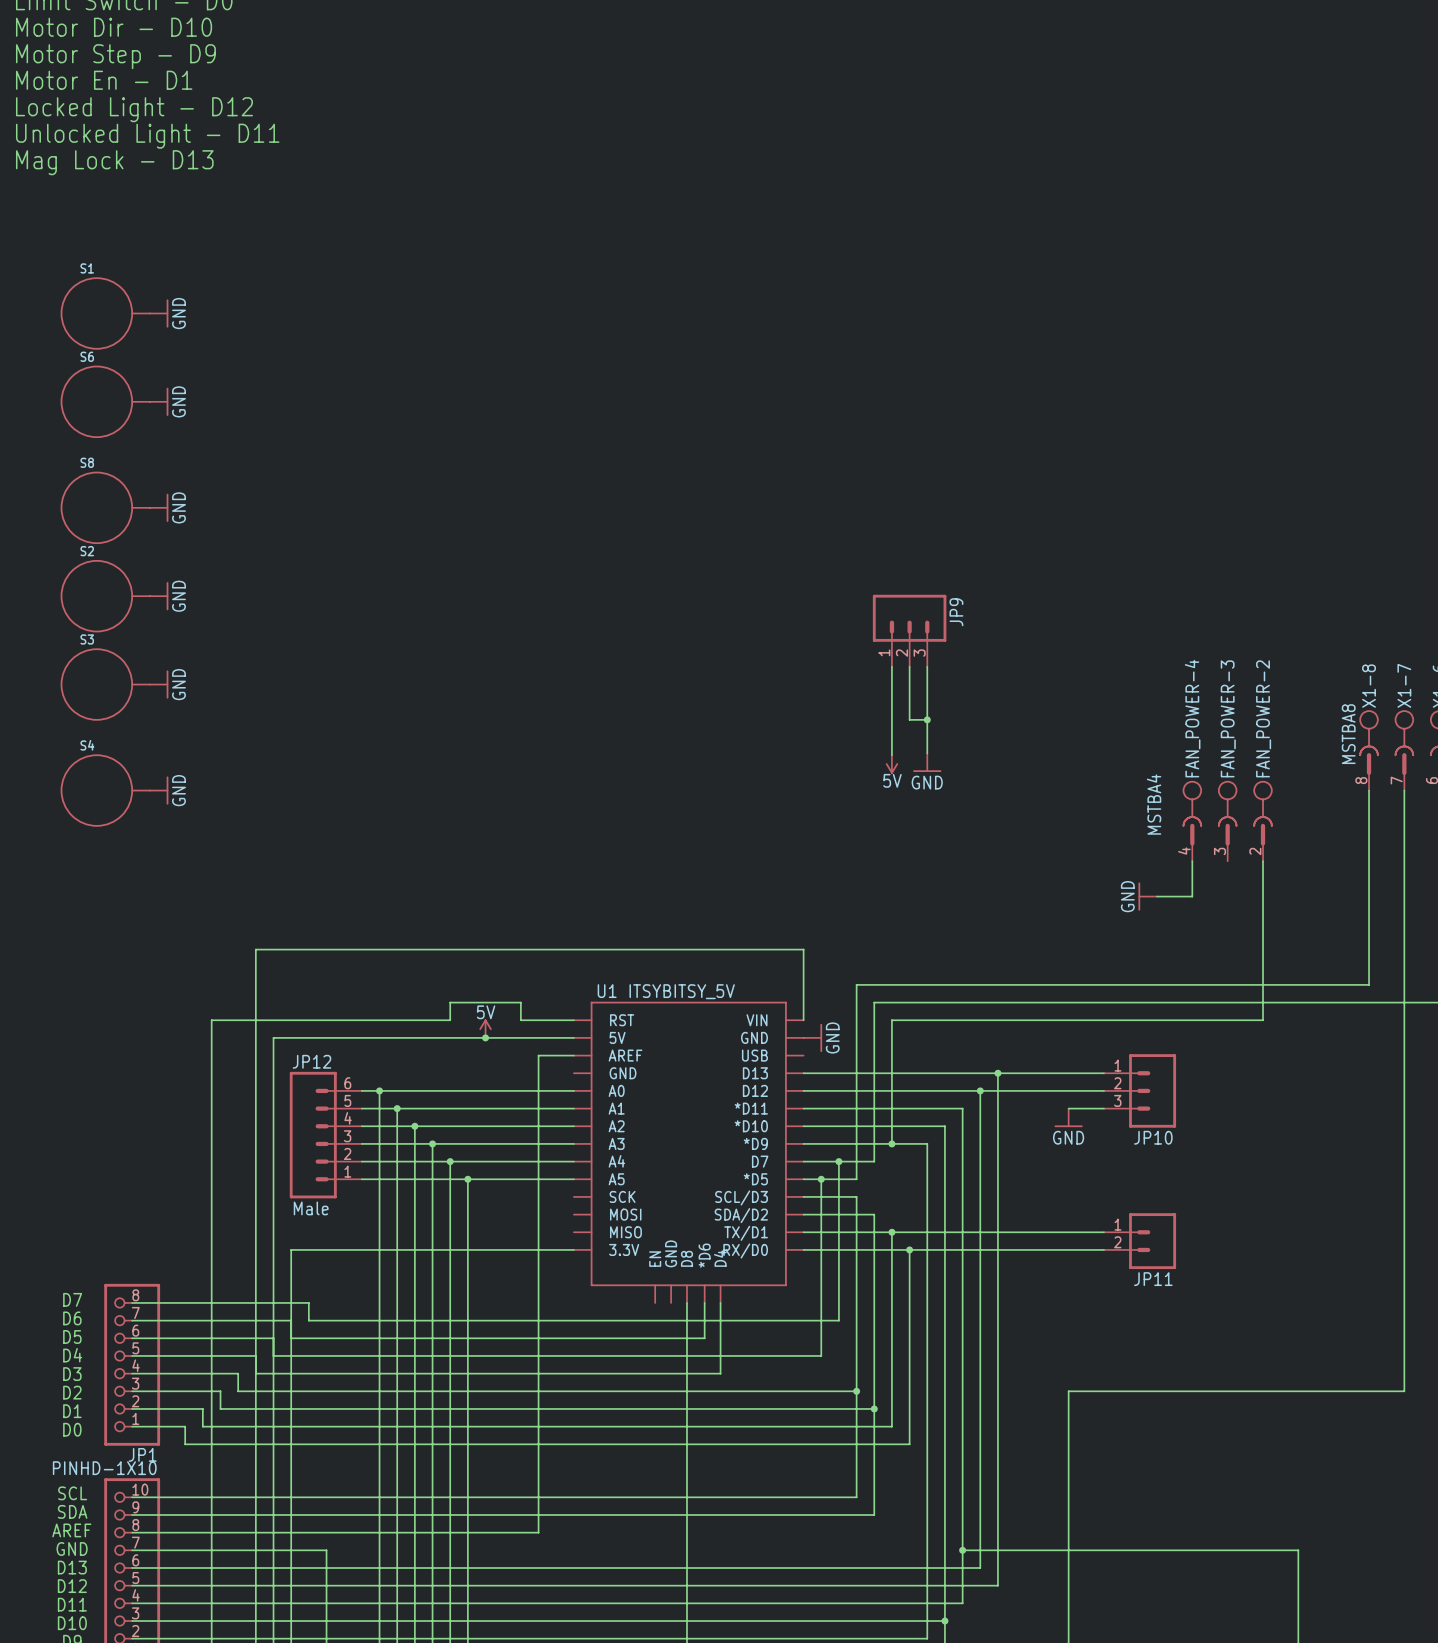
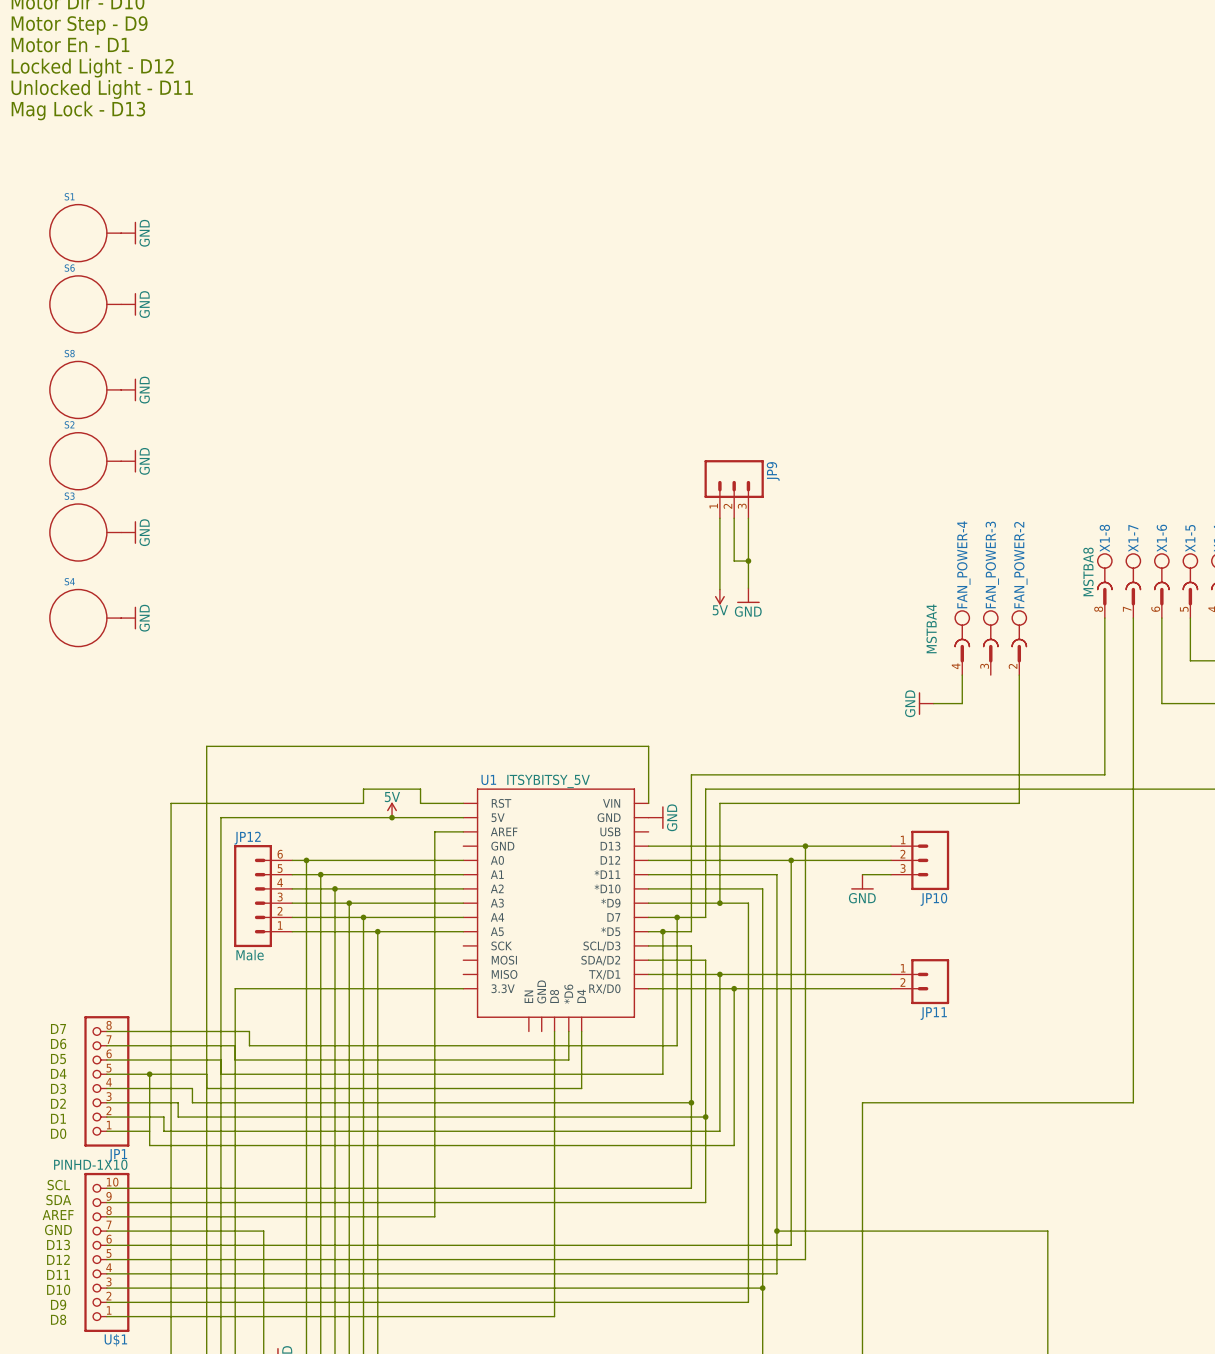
wire: none -> (149, 1074) (149, 1131)
junction: none -> (149, 1074)

